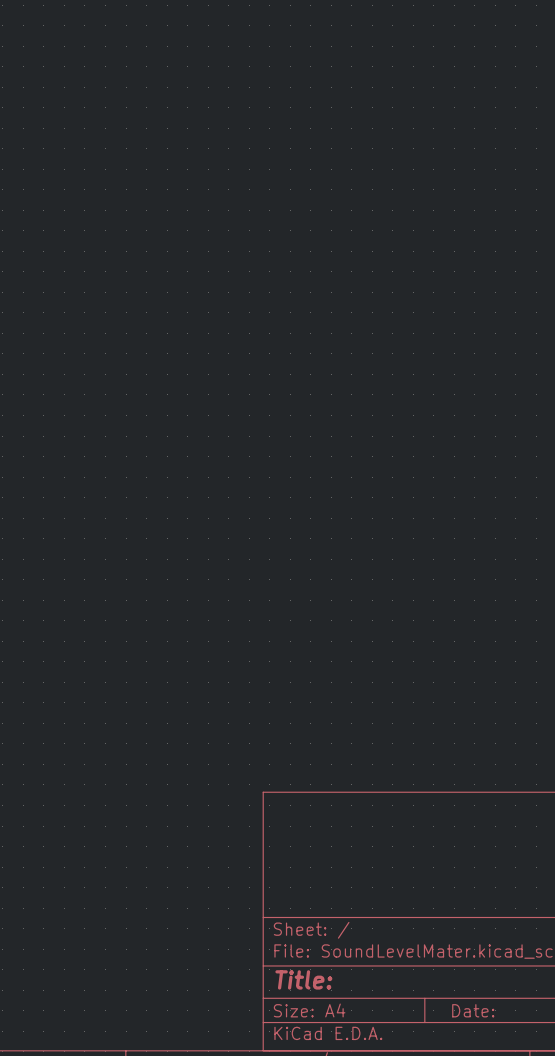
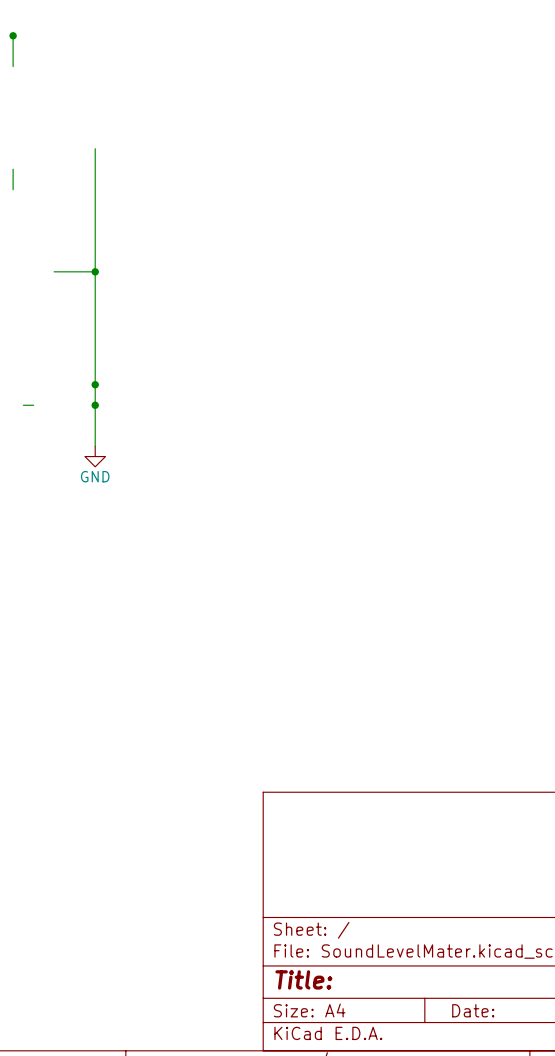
wire: none -> (13, 35) (13, 66)
junction: none -> (13, 35)
wire: none -> (95, 148) (95, 446)
wire: none -> (13, 169) (13, 189)
wire: none -> (54, 271) (95, 271)
junction: none -> (95, 271)
junction: none -> (95, 384)
wire: none -> (23, 405) (33, 405)
junction: none -> (95, 405)
power symbol: none -> GND (95, 456)

